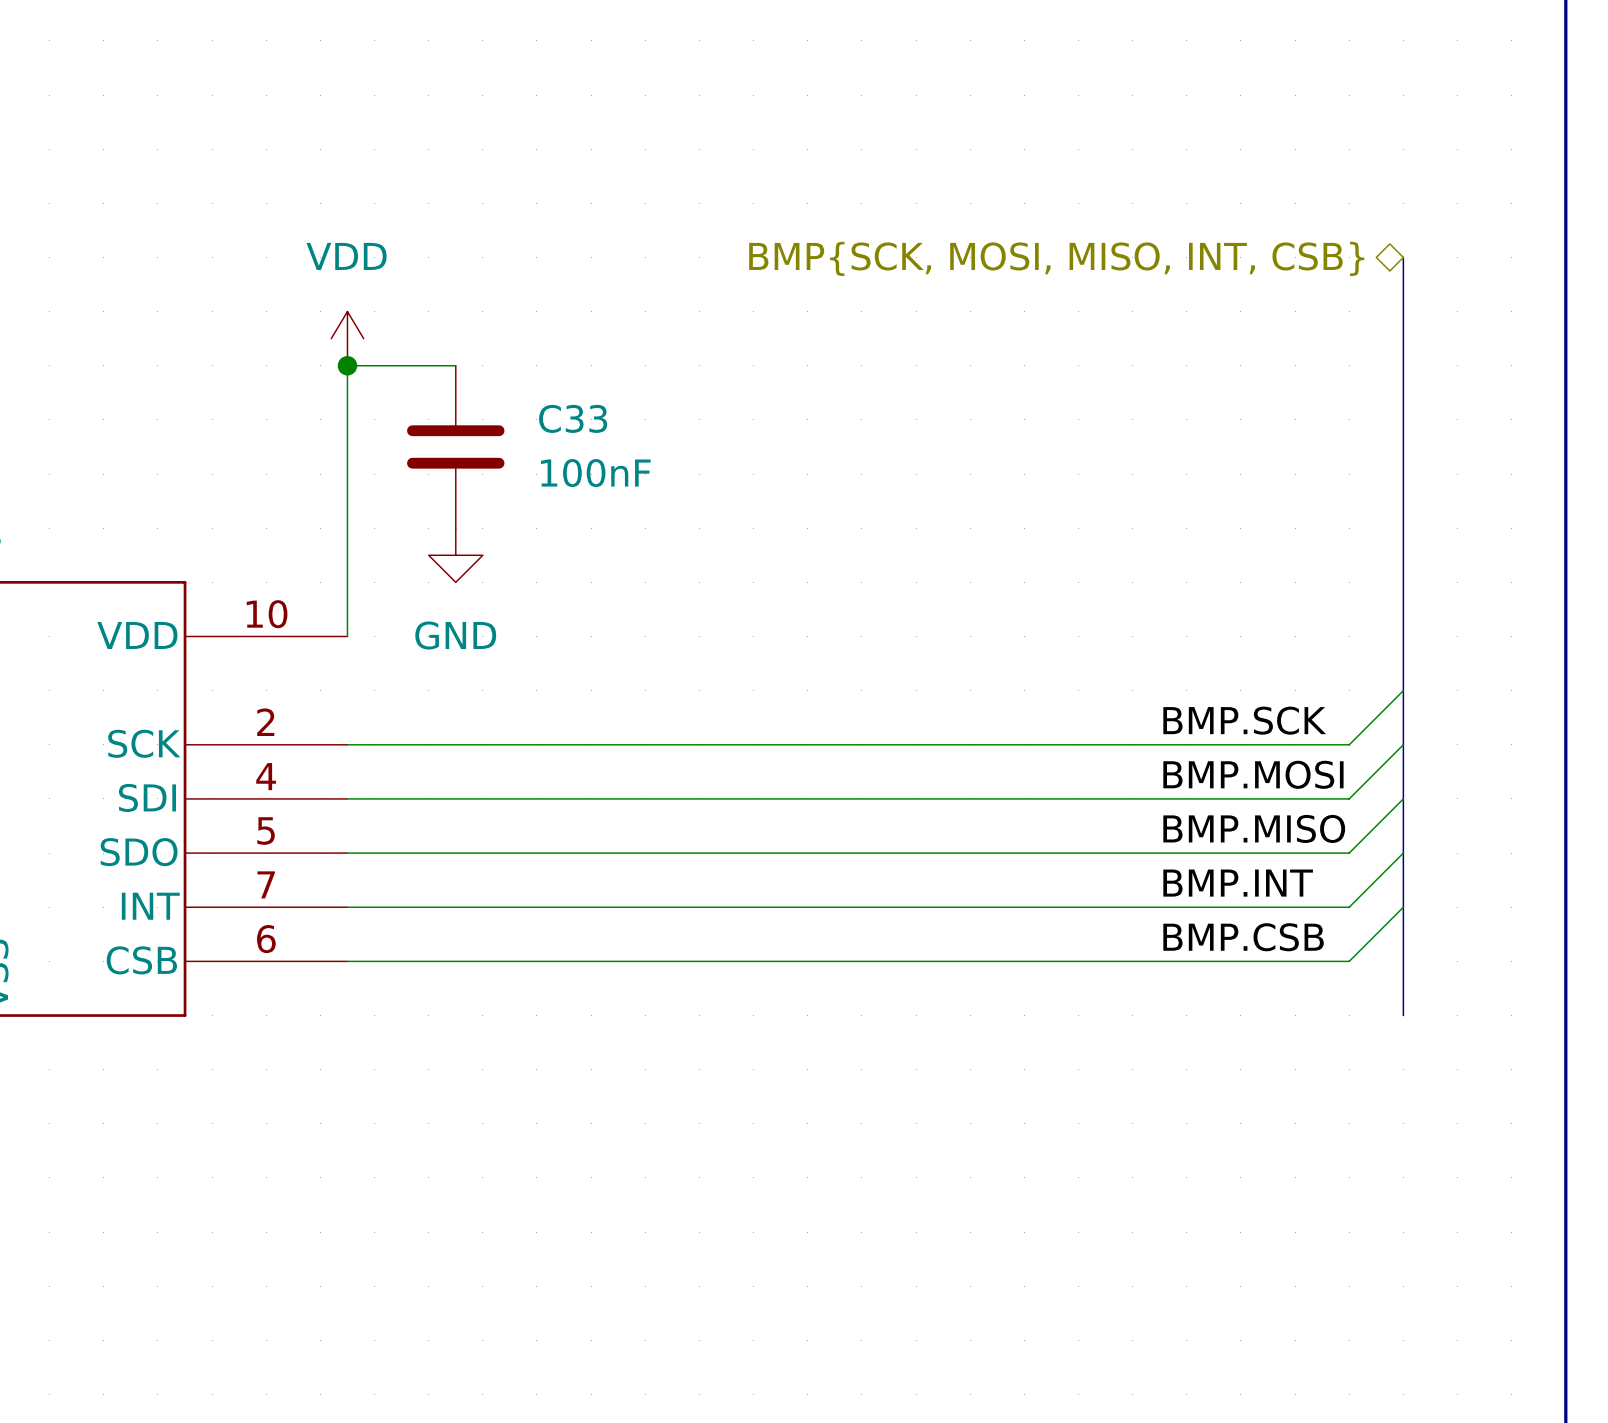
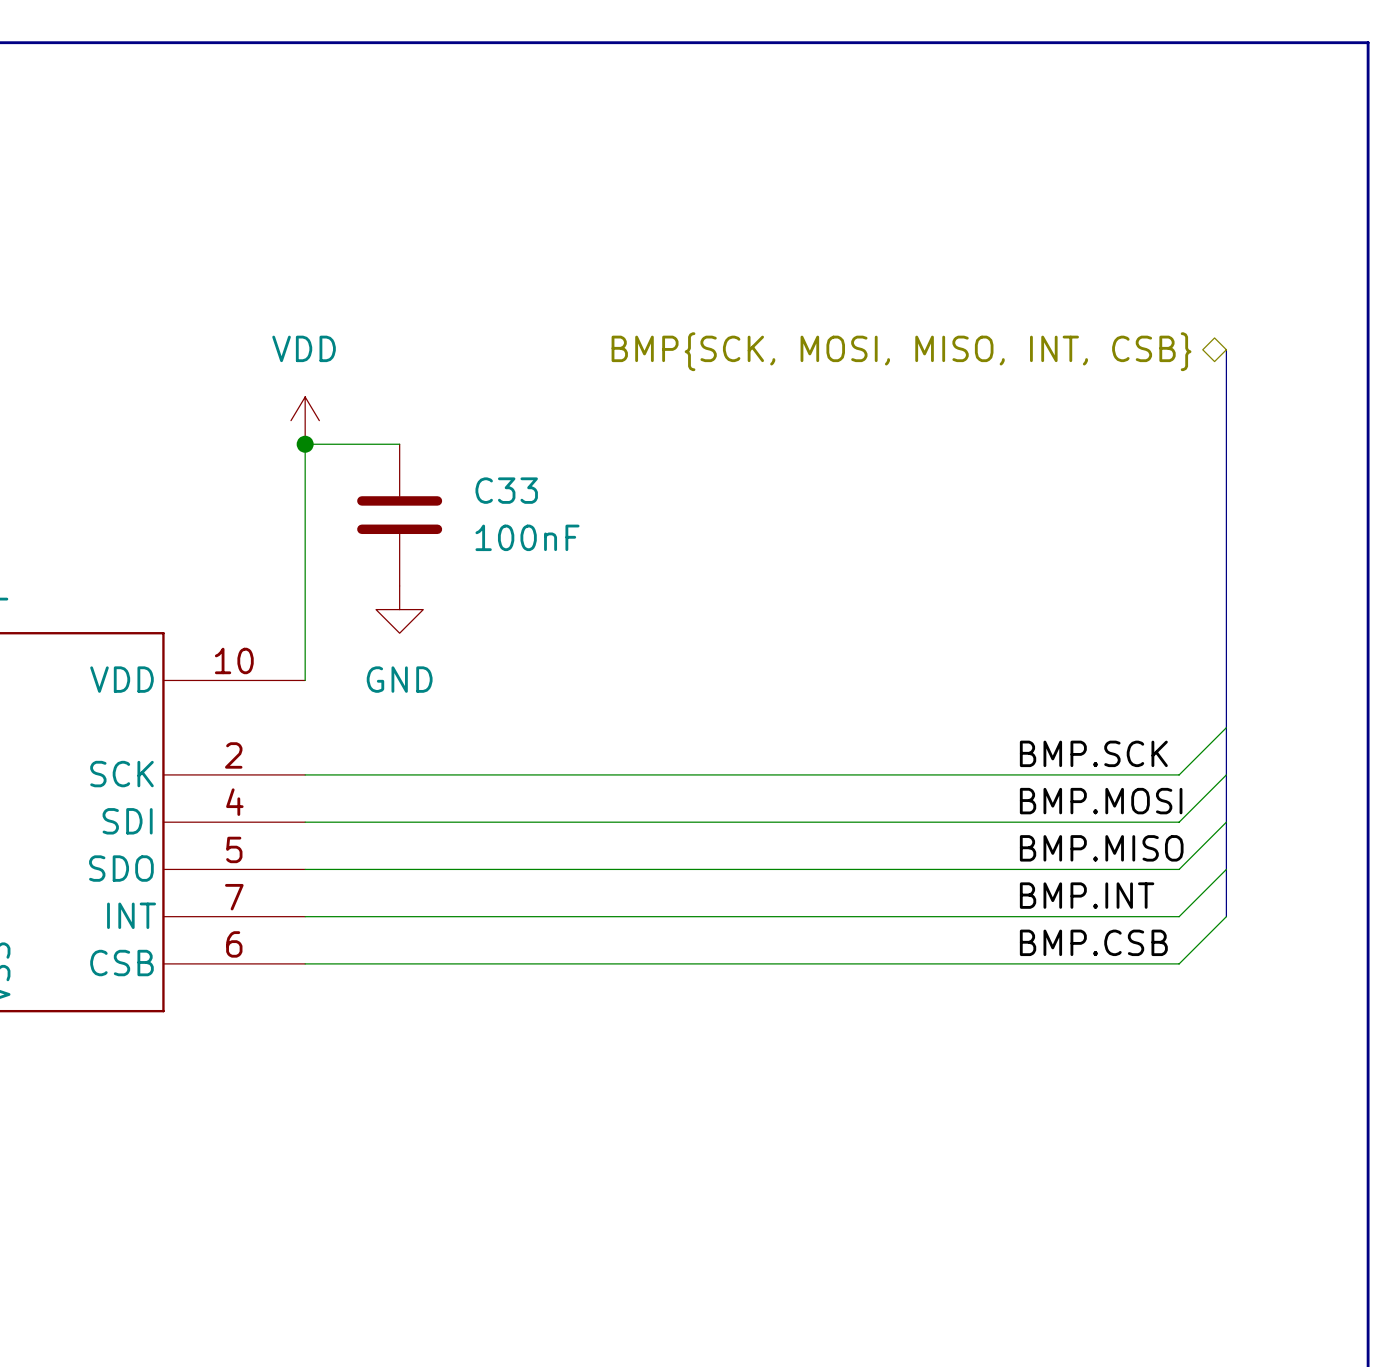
bus: (1403, 907) (1403, 1015) -> none

